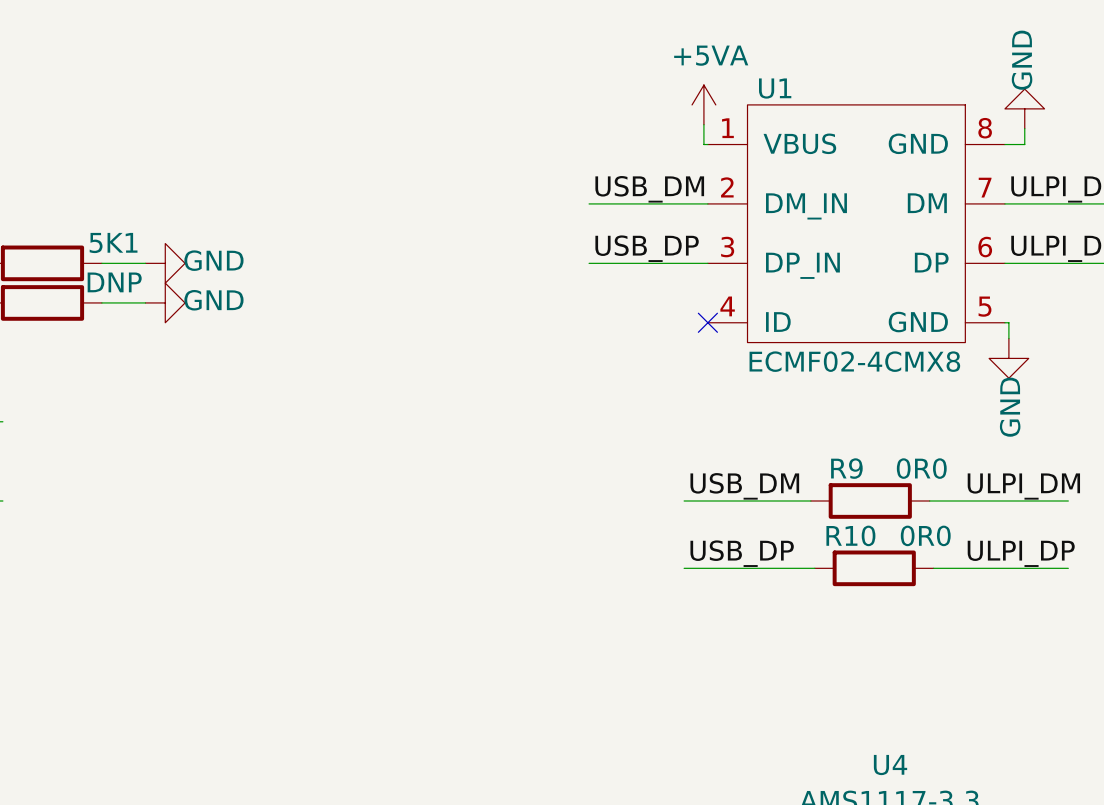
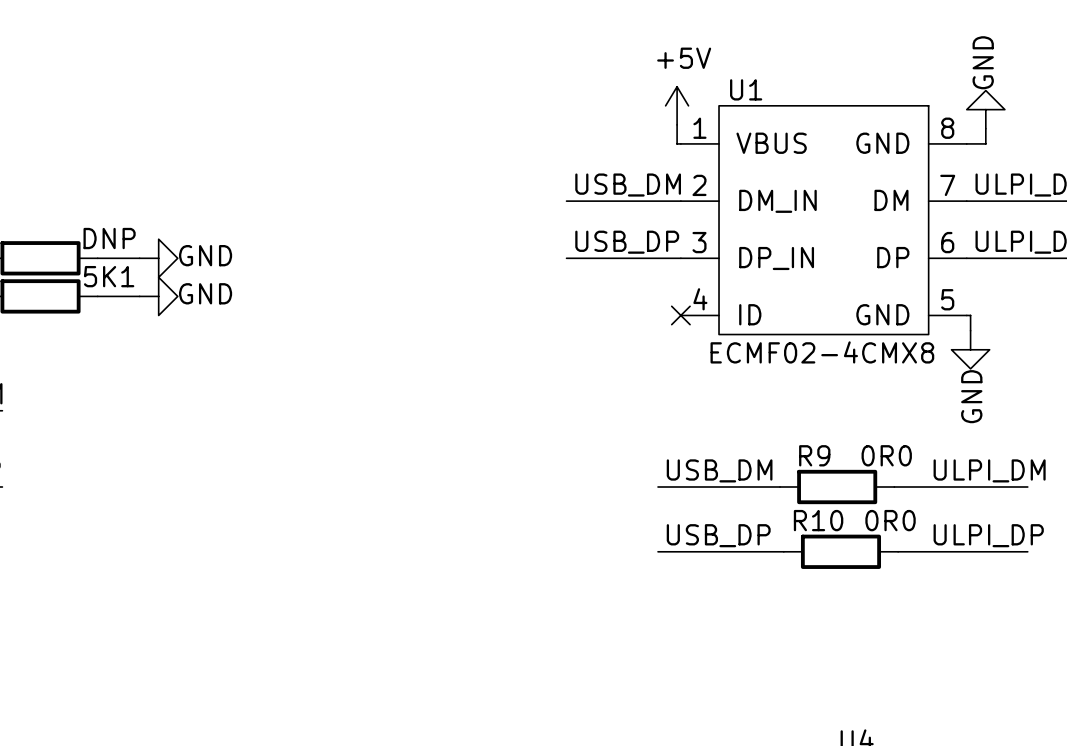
power symbol: +5VA (703, 104) -> +5V (677, 105)
part value: 5K1 (113, 243) -> DNP (109, 238)
part value: DNP (114, 282) -> 5K1 (109, 276)

